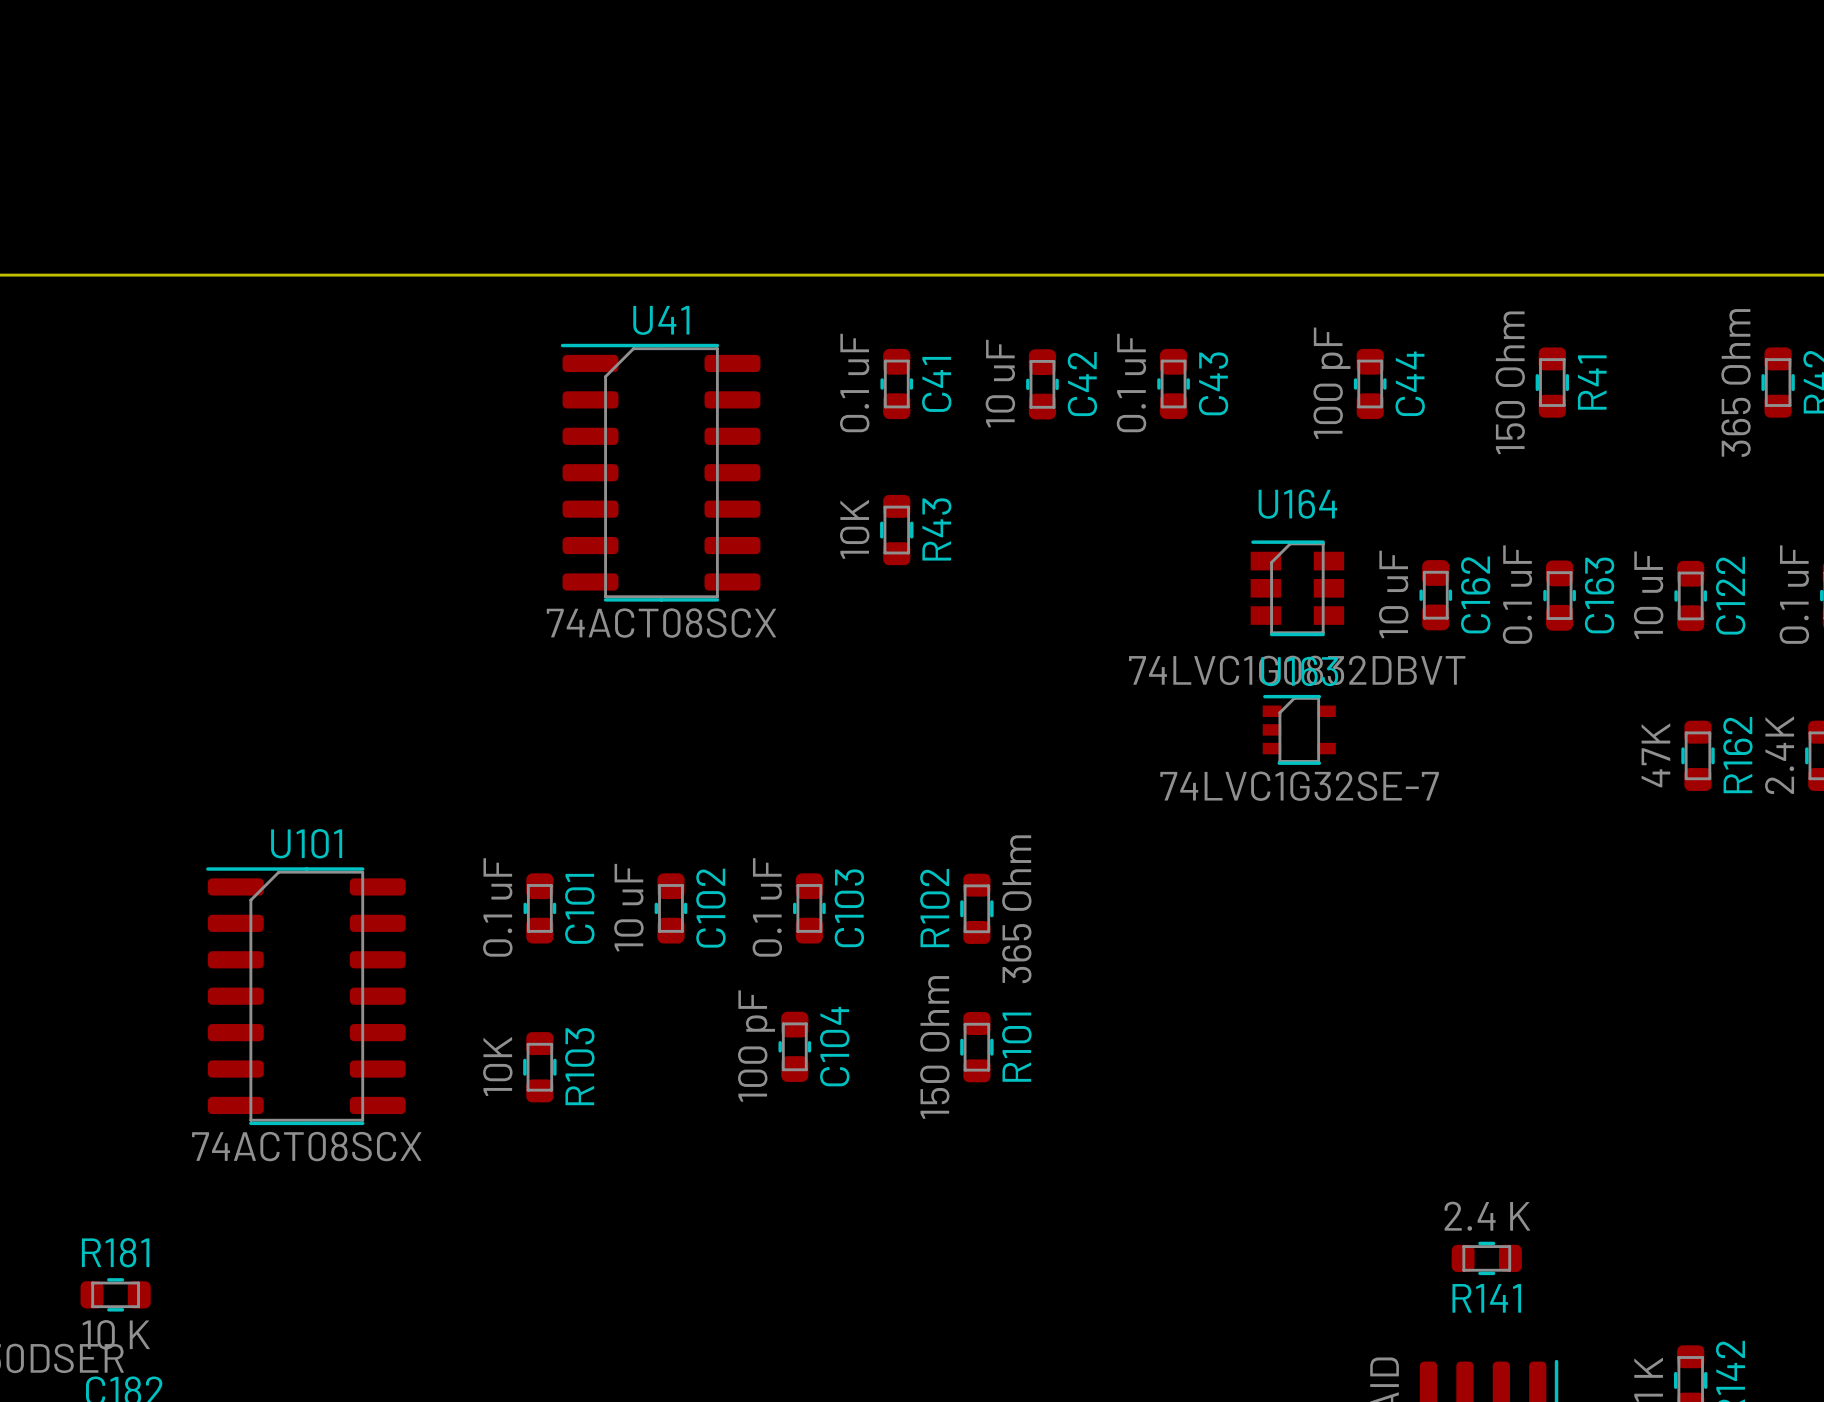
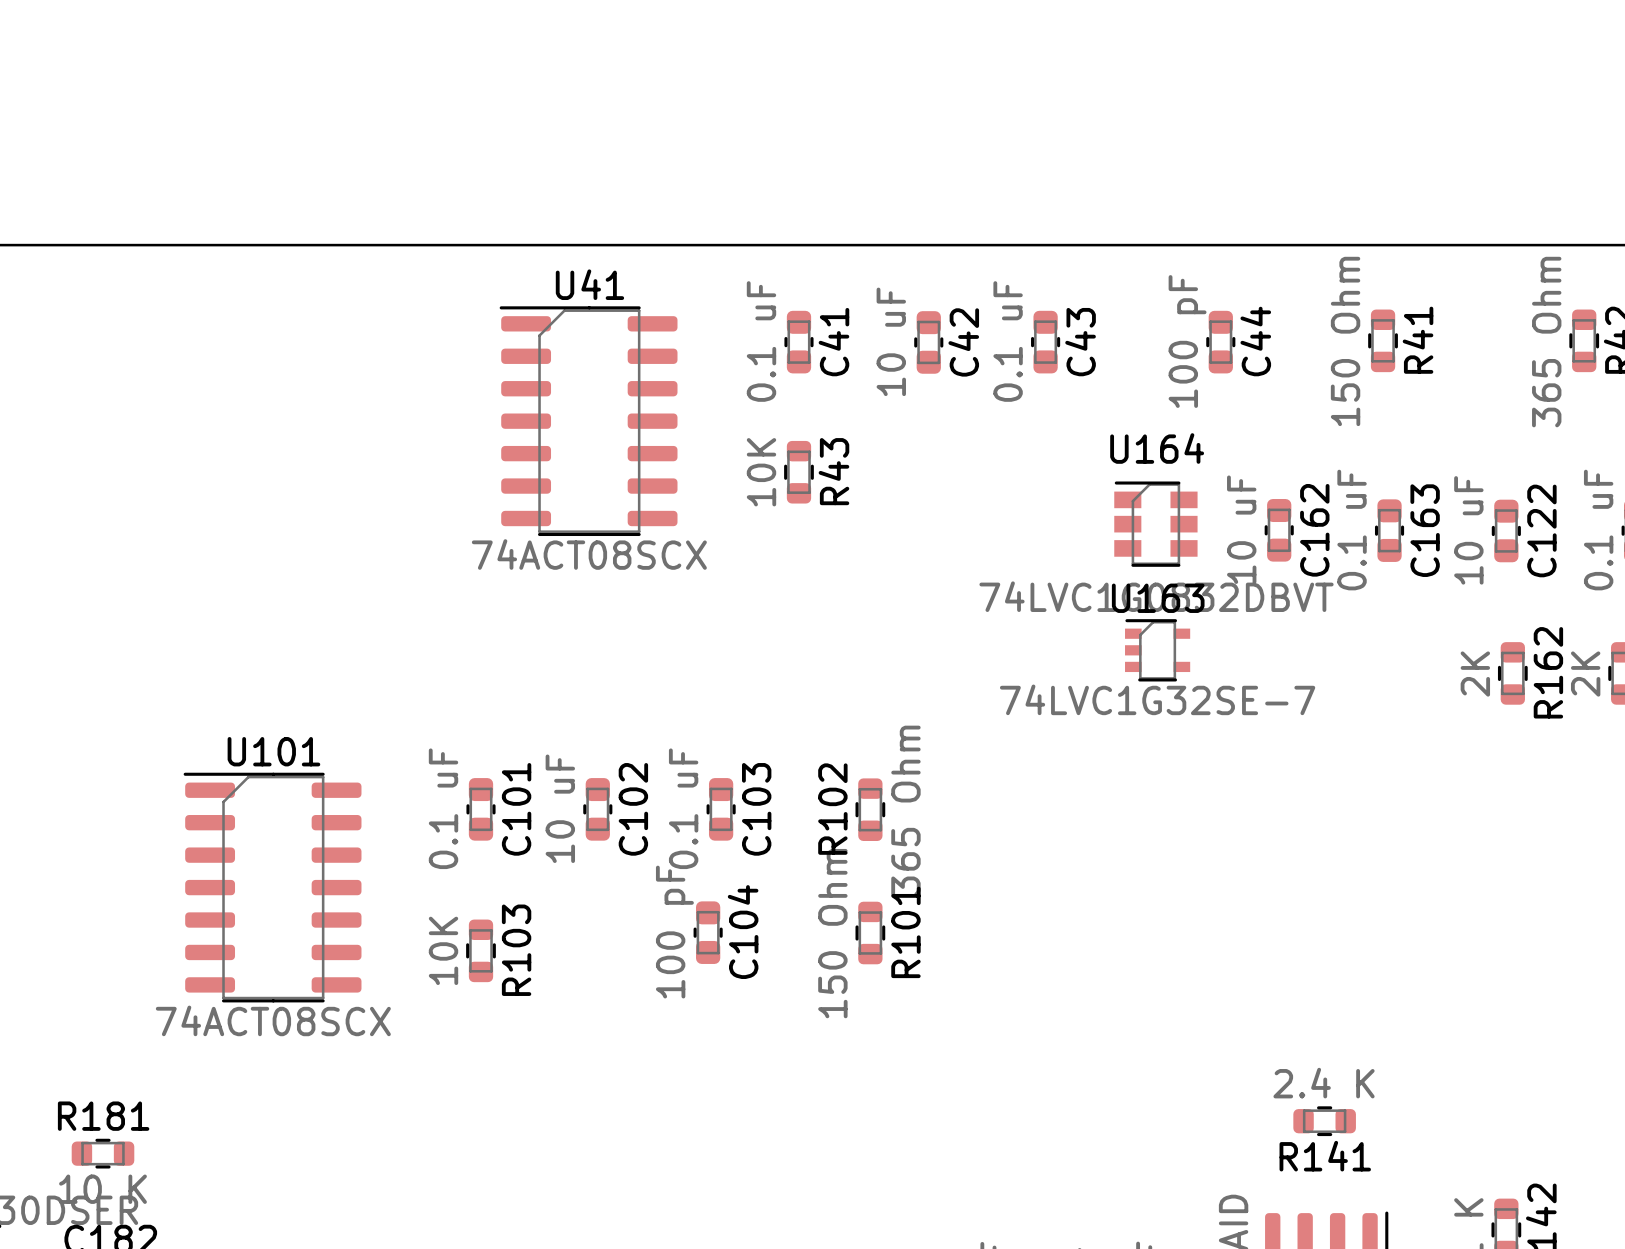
R162 value: 47K (1655, 755) -> 2K (1475, 674)
part value: 2.4K (1779, 755) -> 2K (1585, 674)

